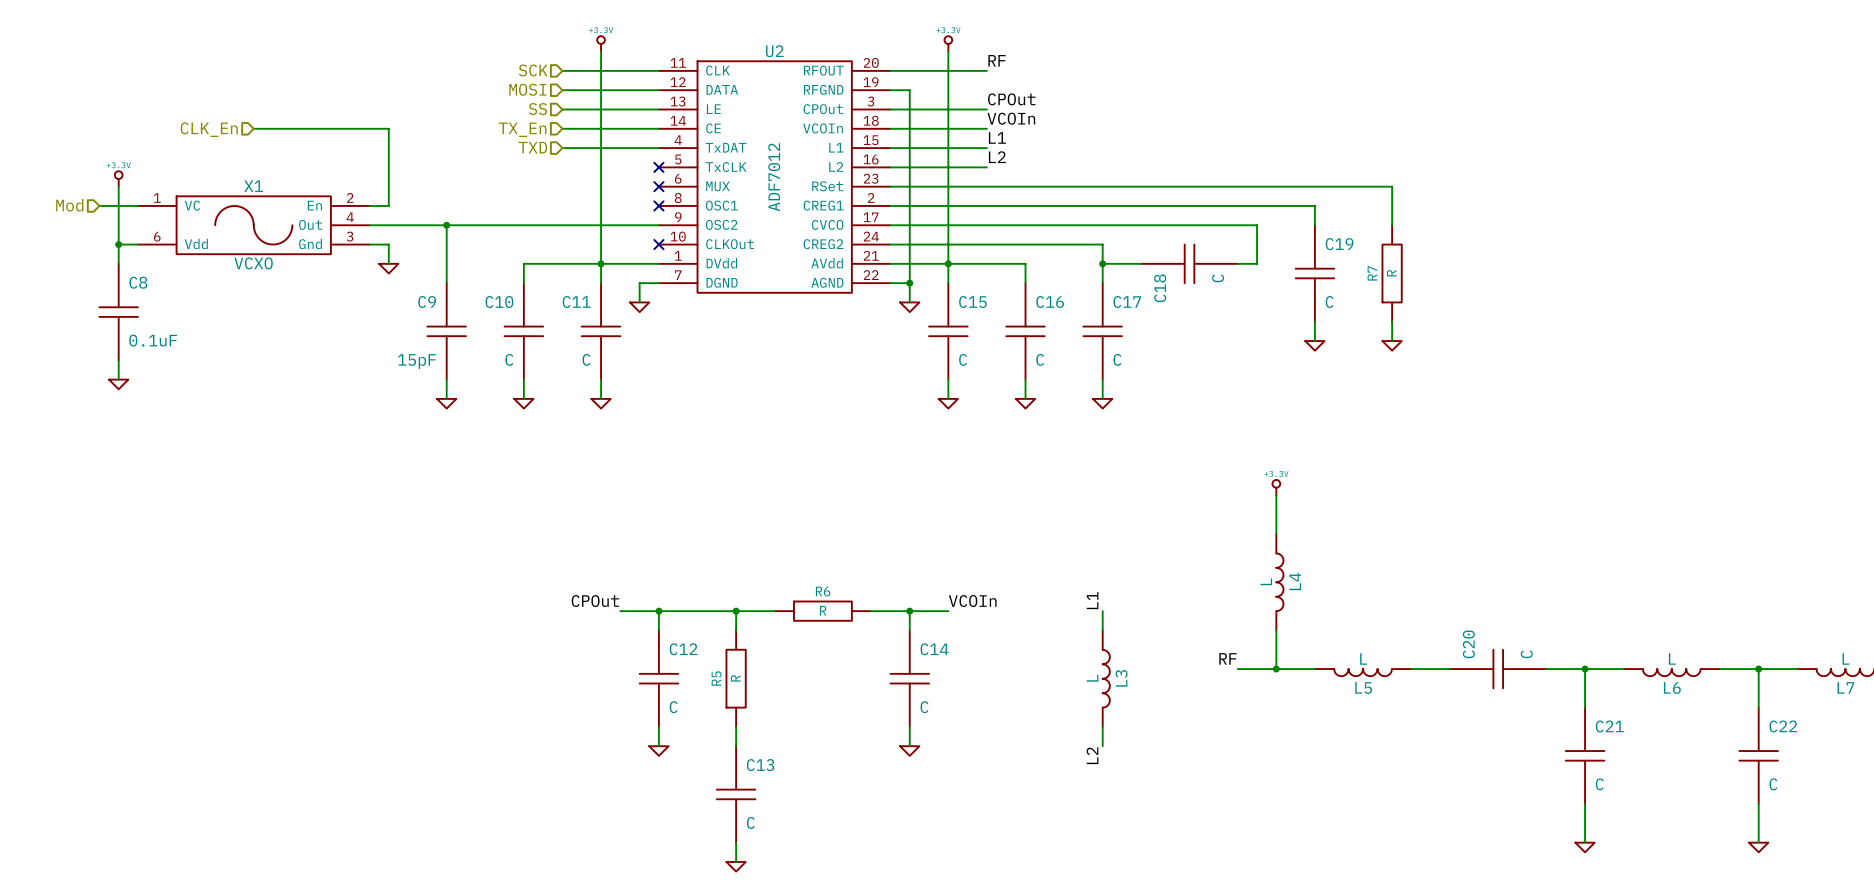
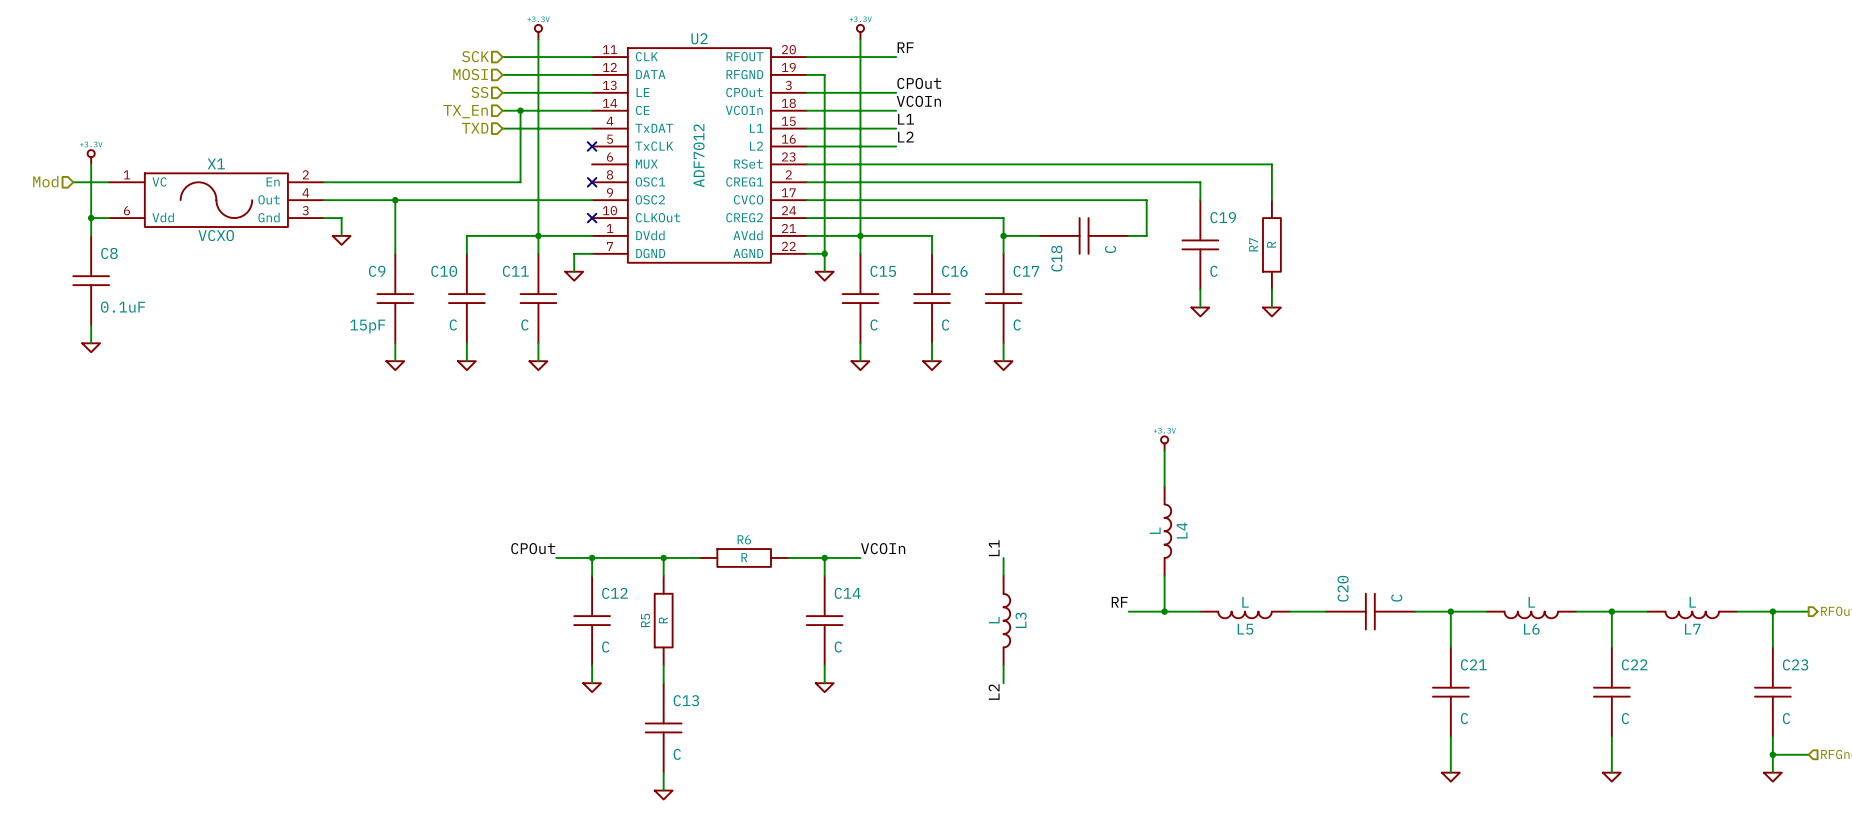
wire: (253, 128) (388, 128) (388, 205) -> (520, 110) (520, 182) (341, 182)
junction: none -> (520, 110)
hierarchical label: CLK_En (209, 129) -> none
no-connect mark: (658, 186) -> none

